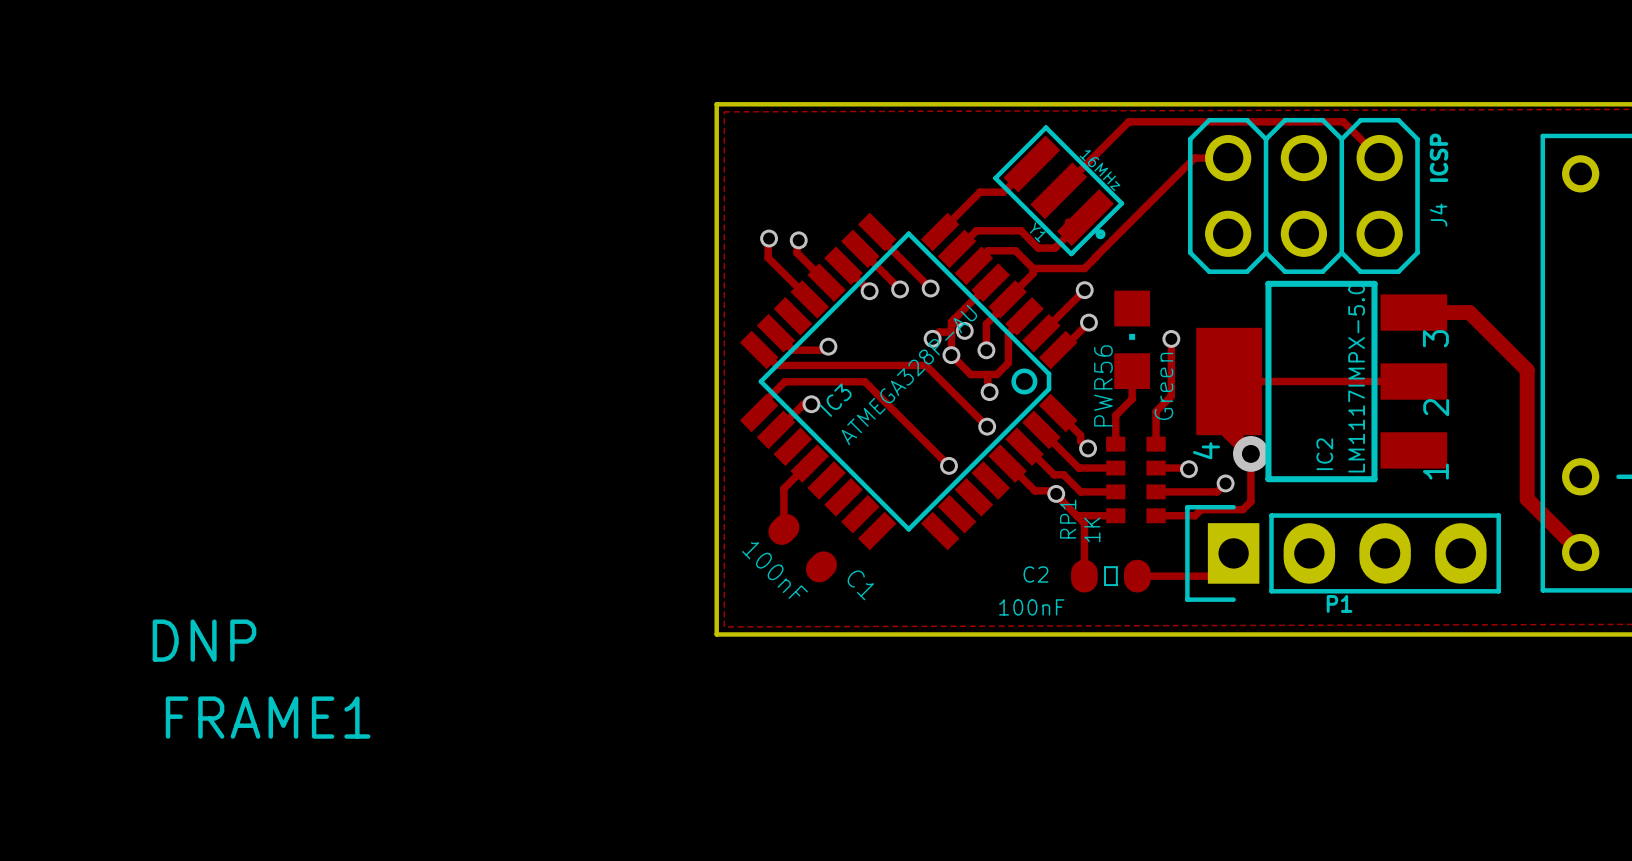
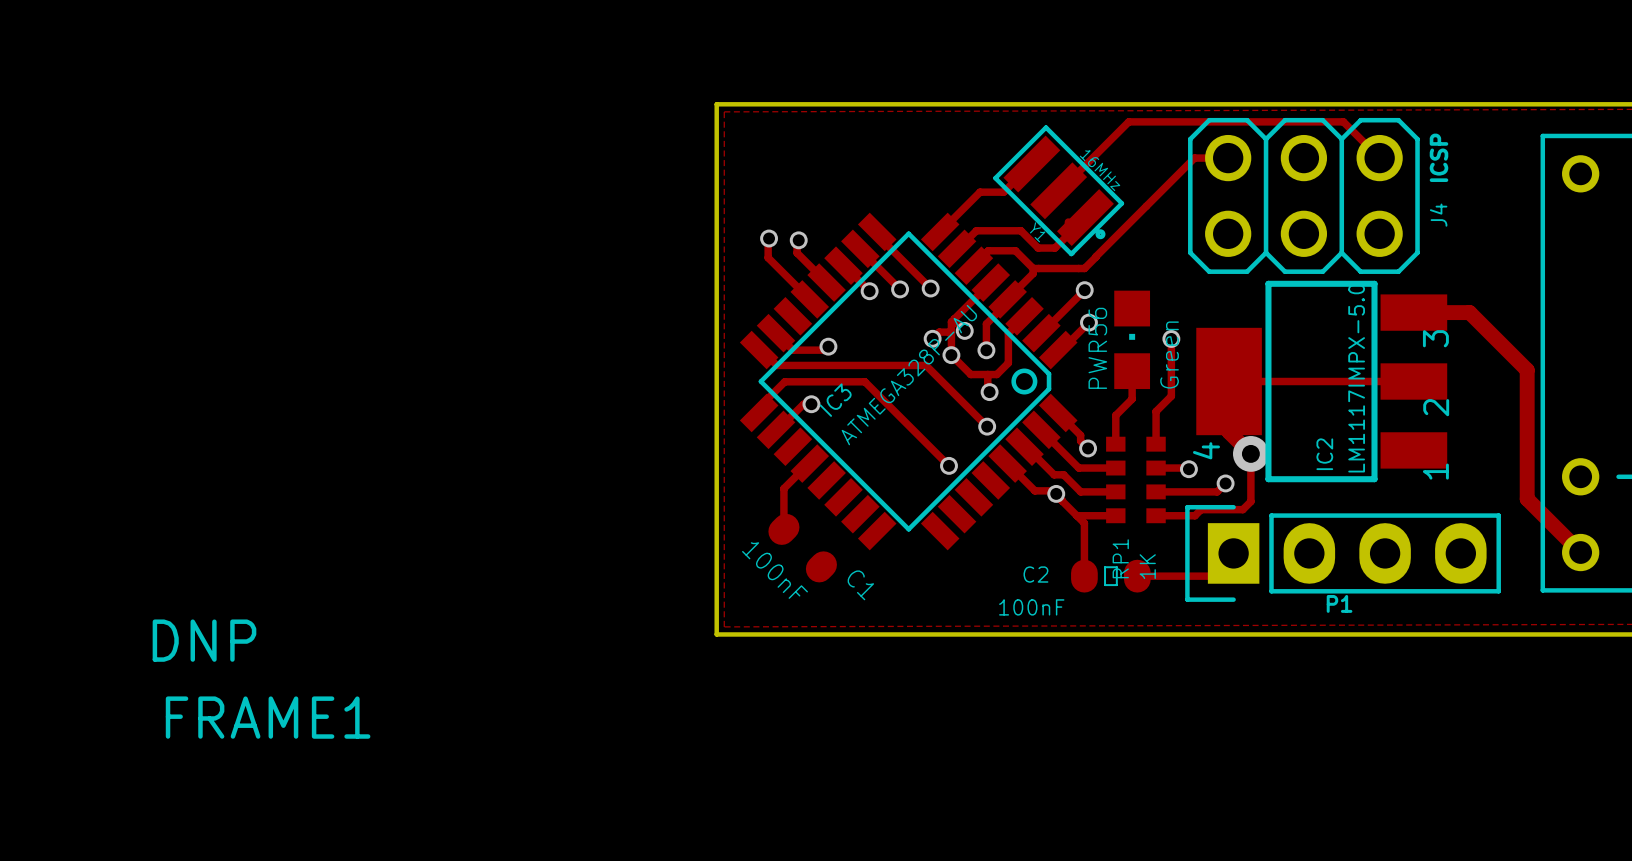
PWR56 name position: PWR56 (1103, 385) -> PWR56 (1097, 348)
PWR56 value position: Green (1163, 386) -> Green (1169, 355)
RP1 name position: RP1 (1068, 519) -> RP1 (1120, 558)
RP1 value position: 1K (1092, 529) -> 1K (1147, 566)

